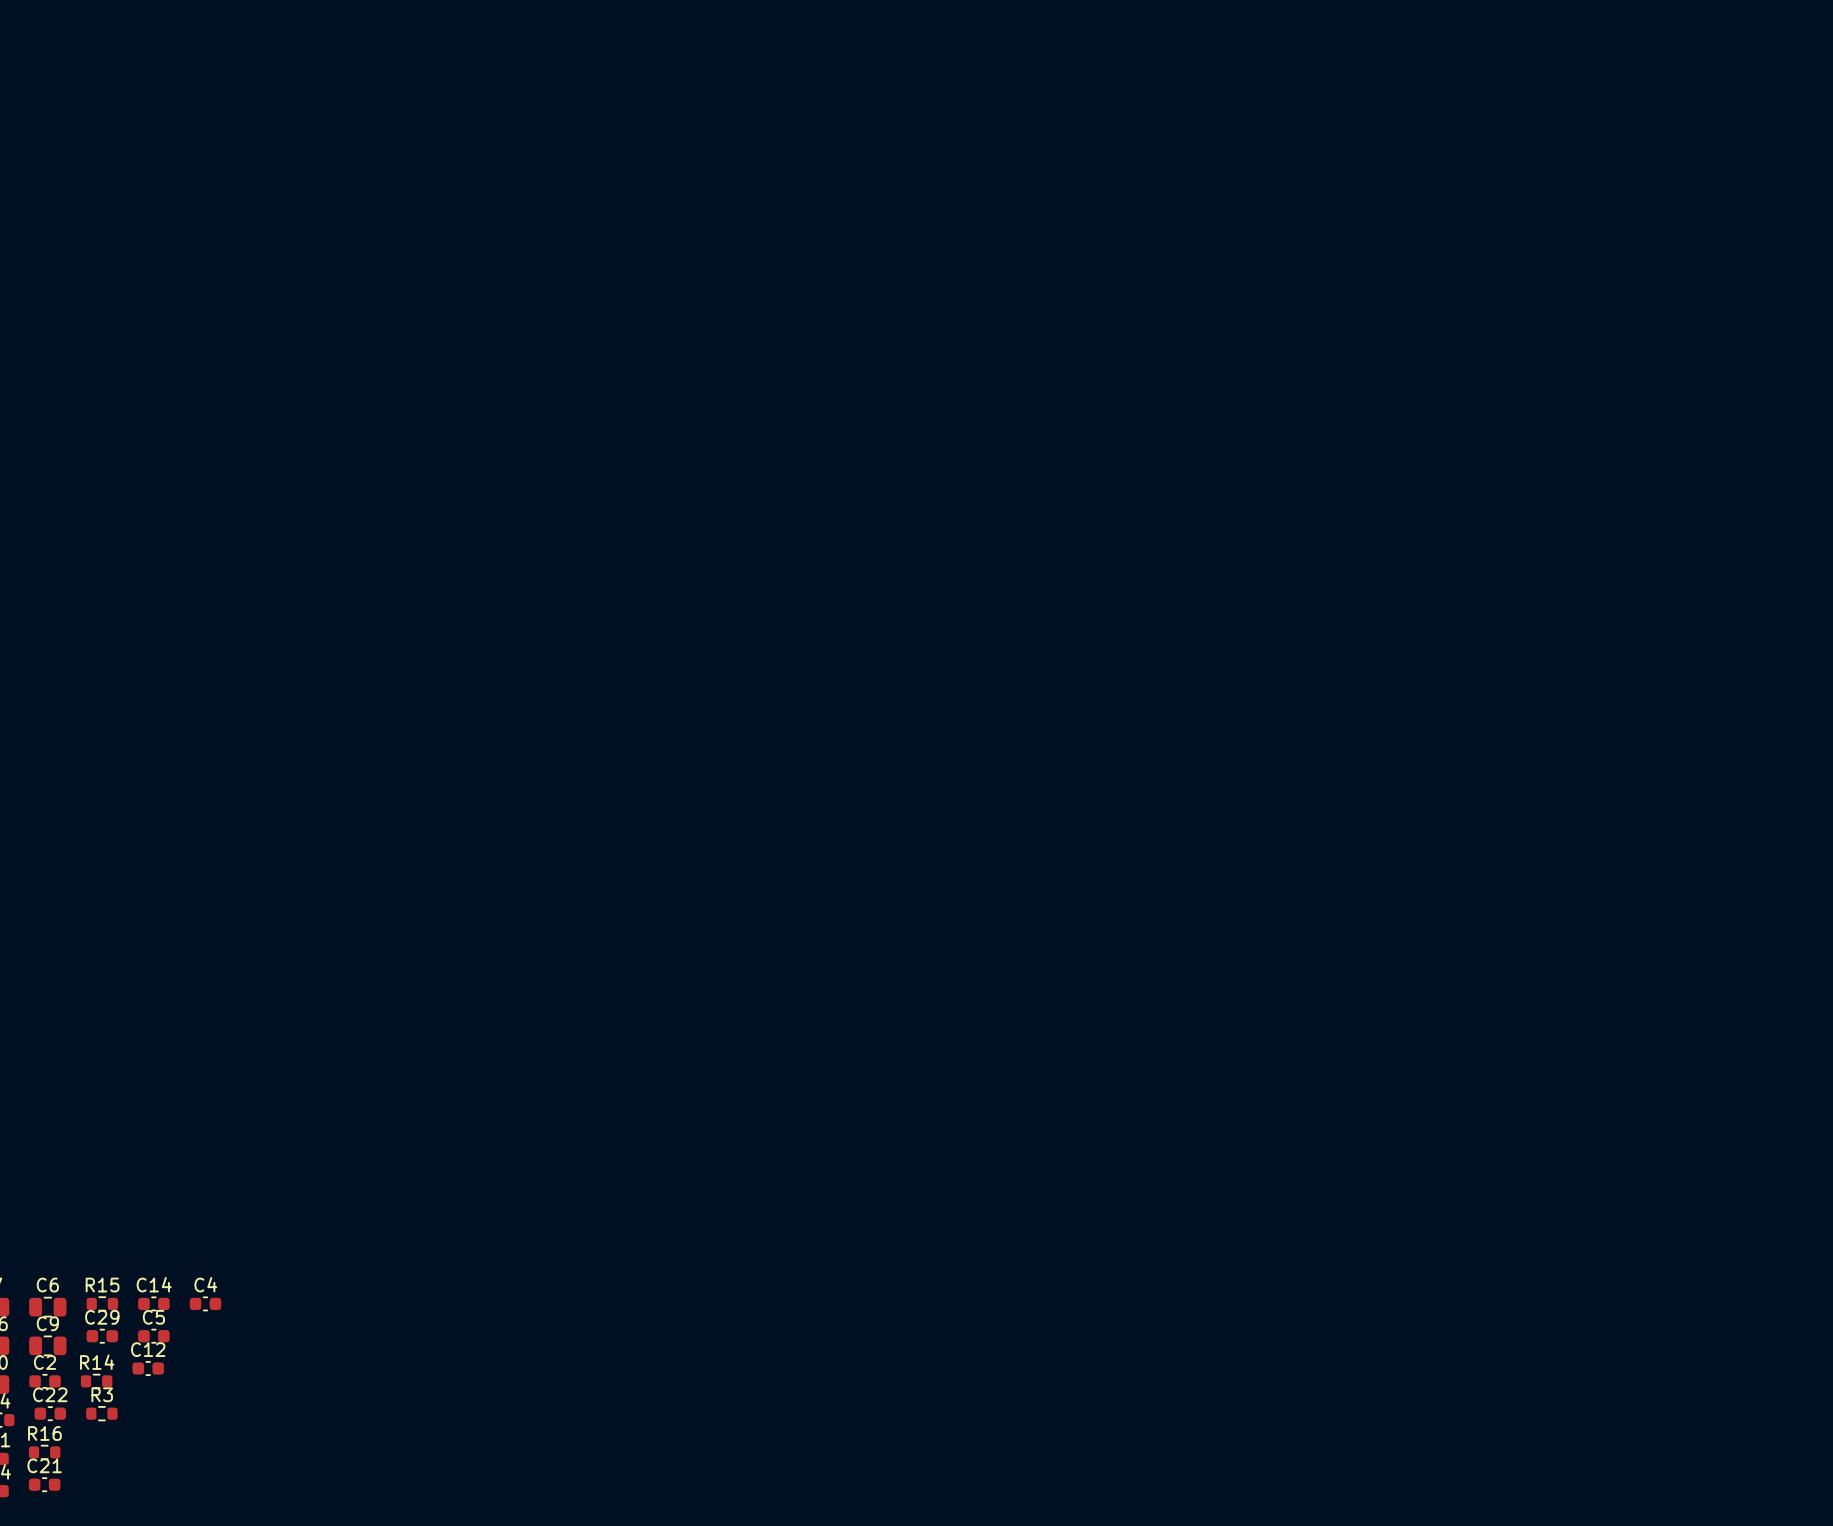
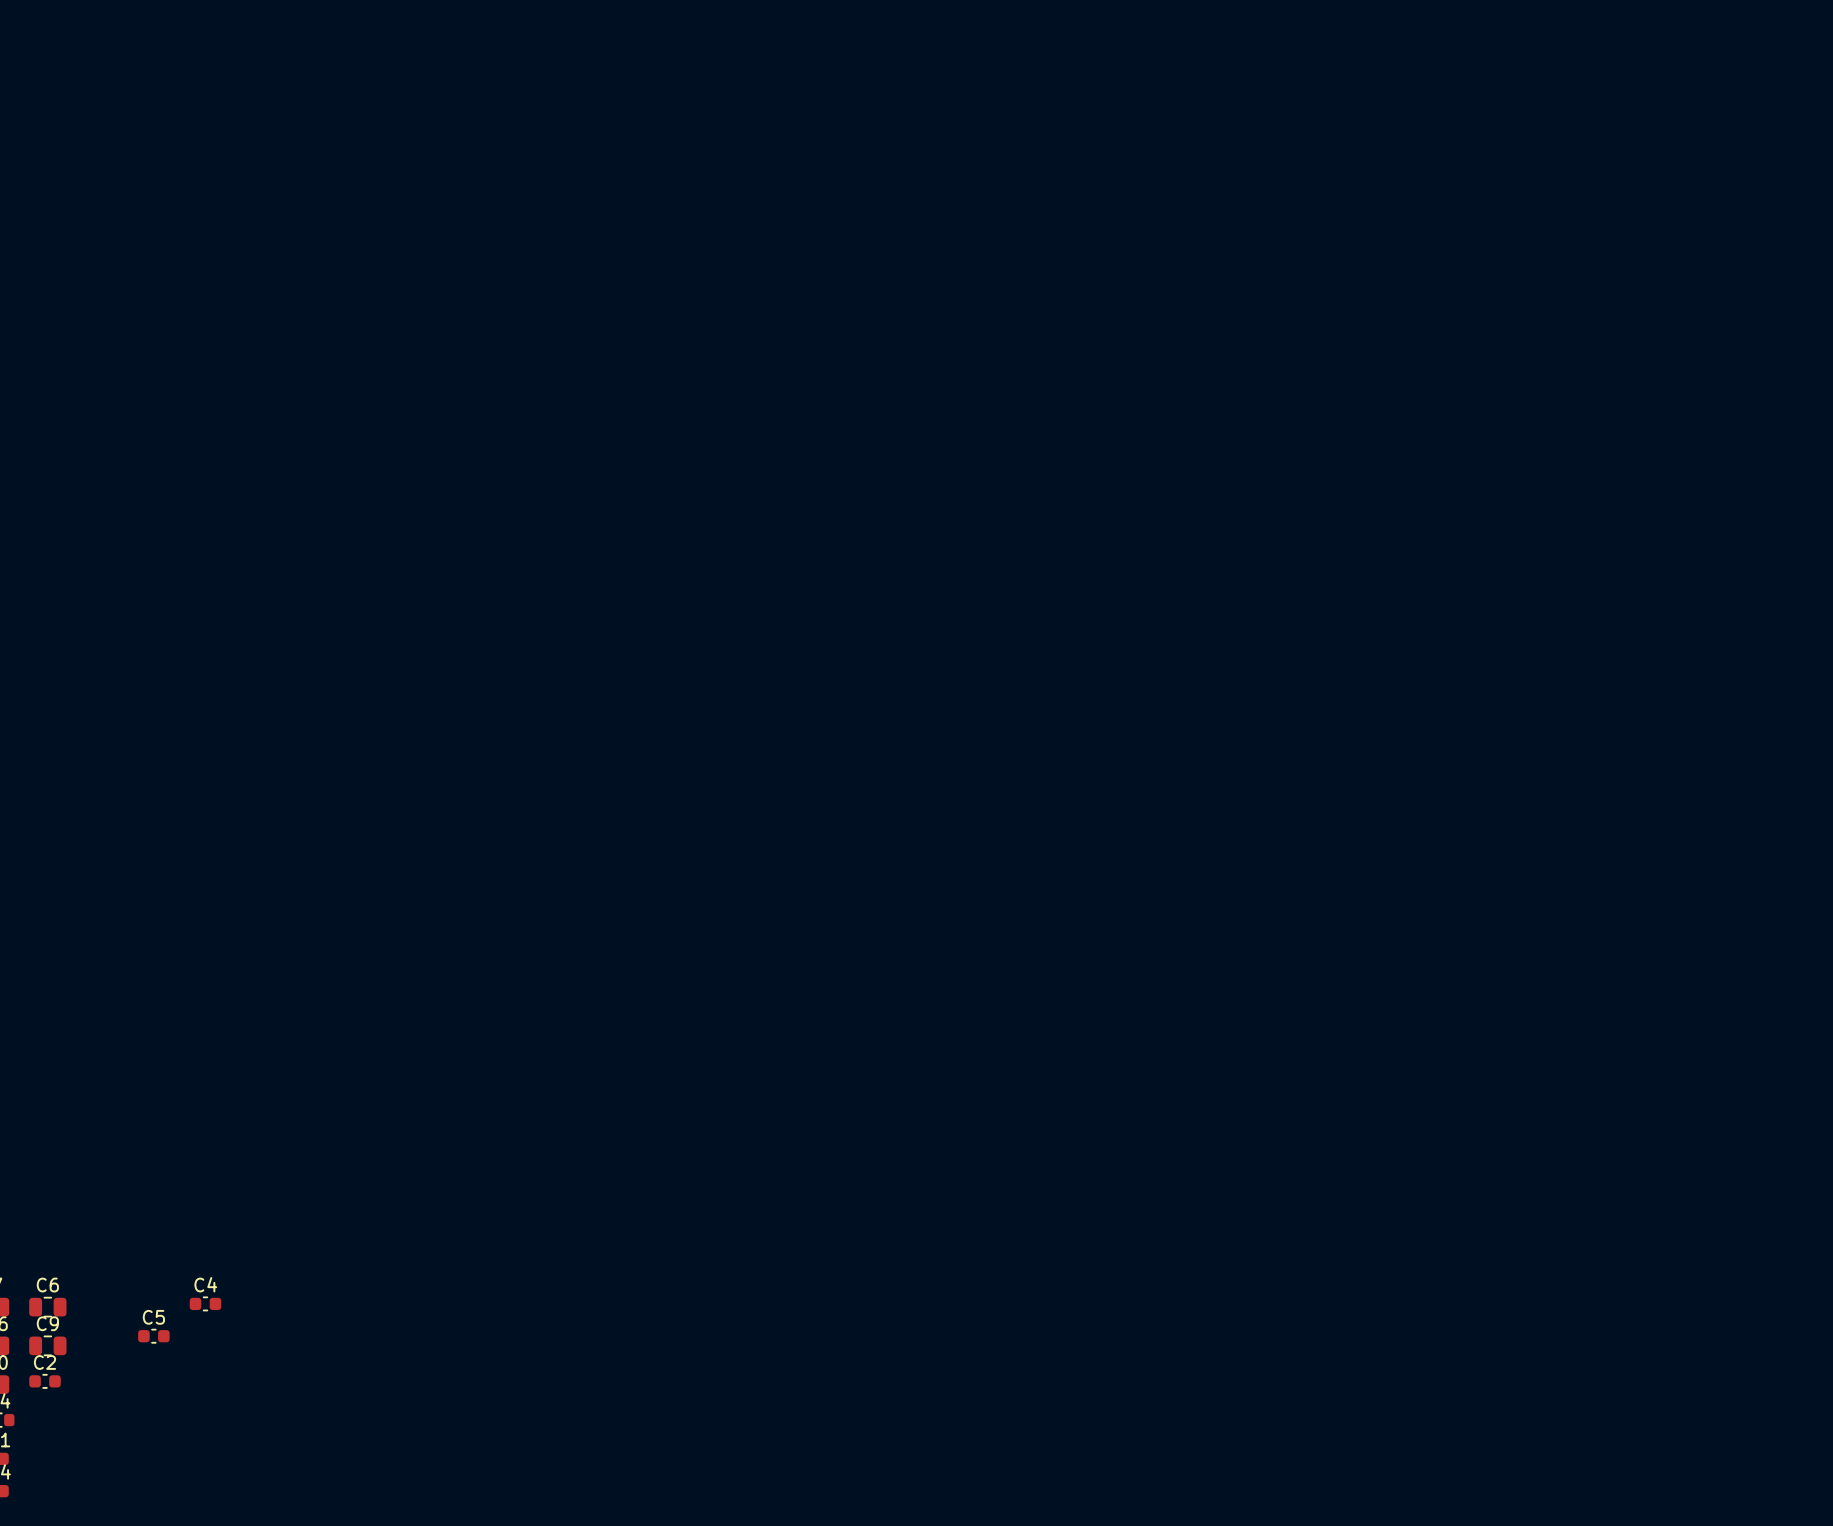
R15: (102, 1303) -> none
C14: (153, 1303) -> none
C29: (102, 1336) -> none
C12: (148, 1368) -> none
R14: (96, 1381) -> none
C22: (50, 1413) -> none
R3: (101, 1413) -> none
R16: (44, 1452) -> none
C21: (44, 1484) -> none

